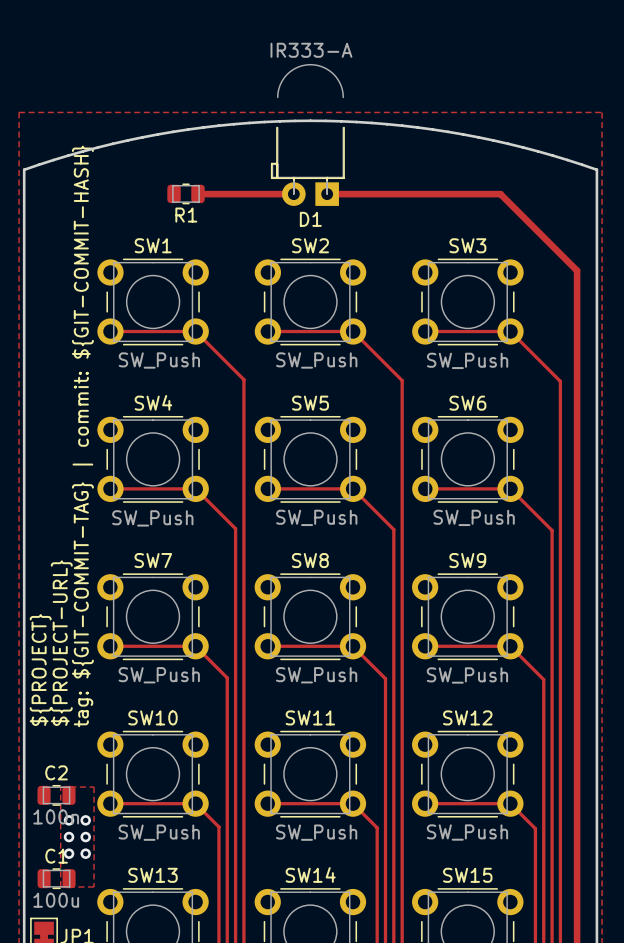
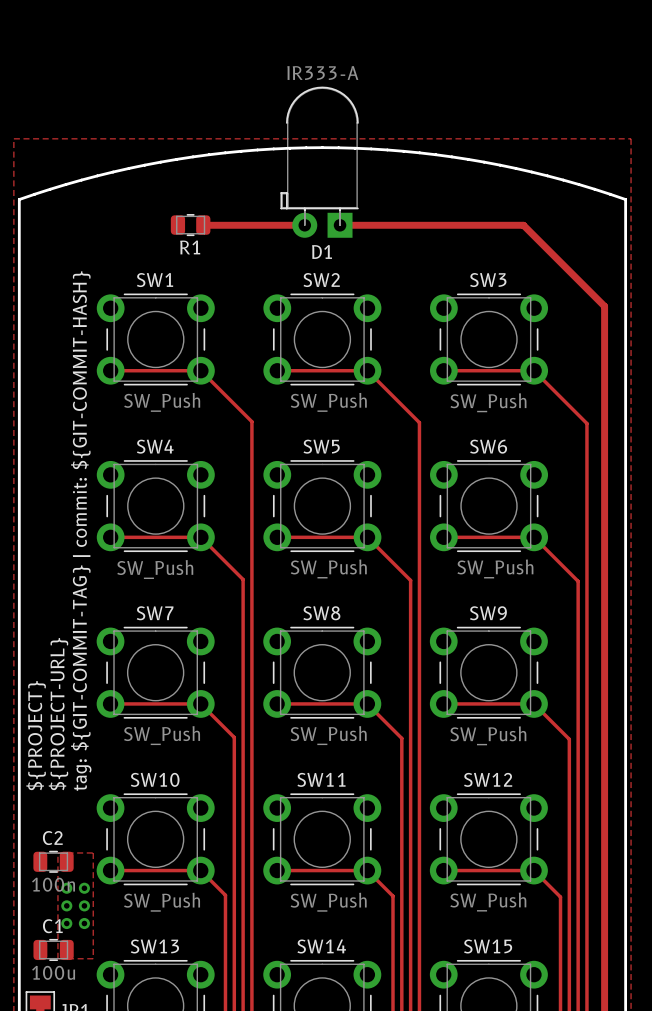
D1 footprint: [270, 64, 345, 206] -> [280, 86, 359, 238]

